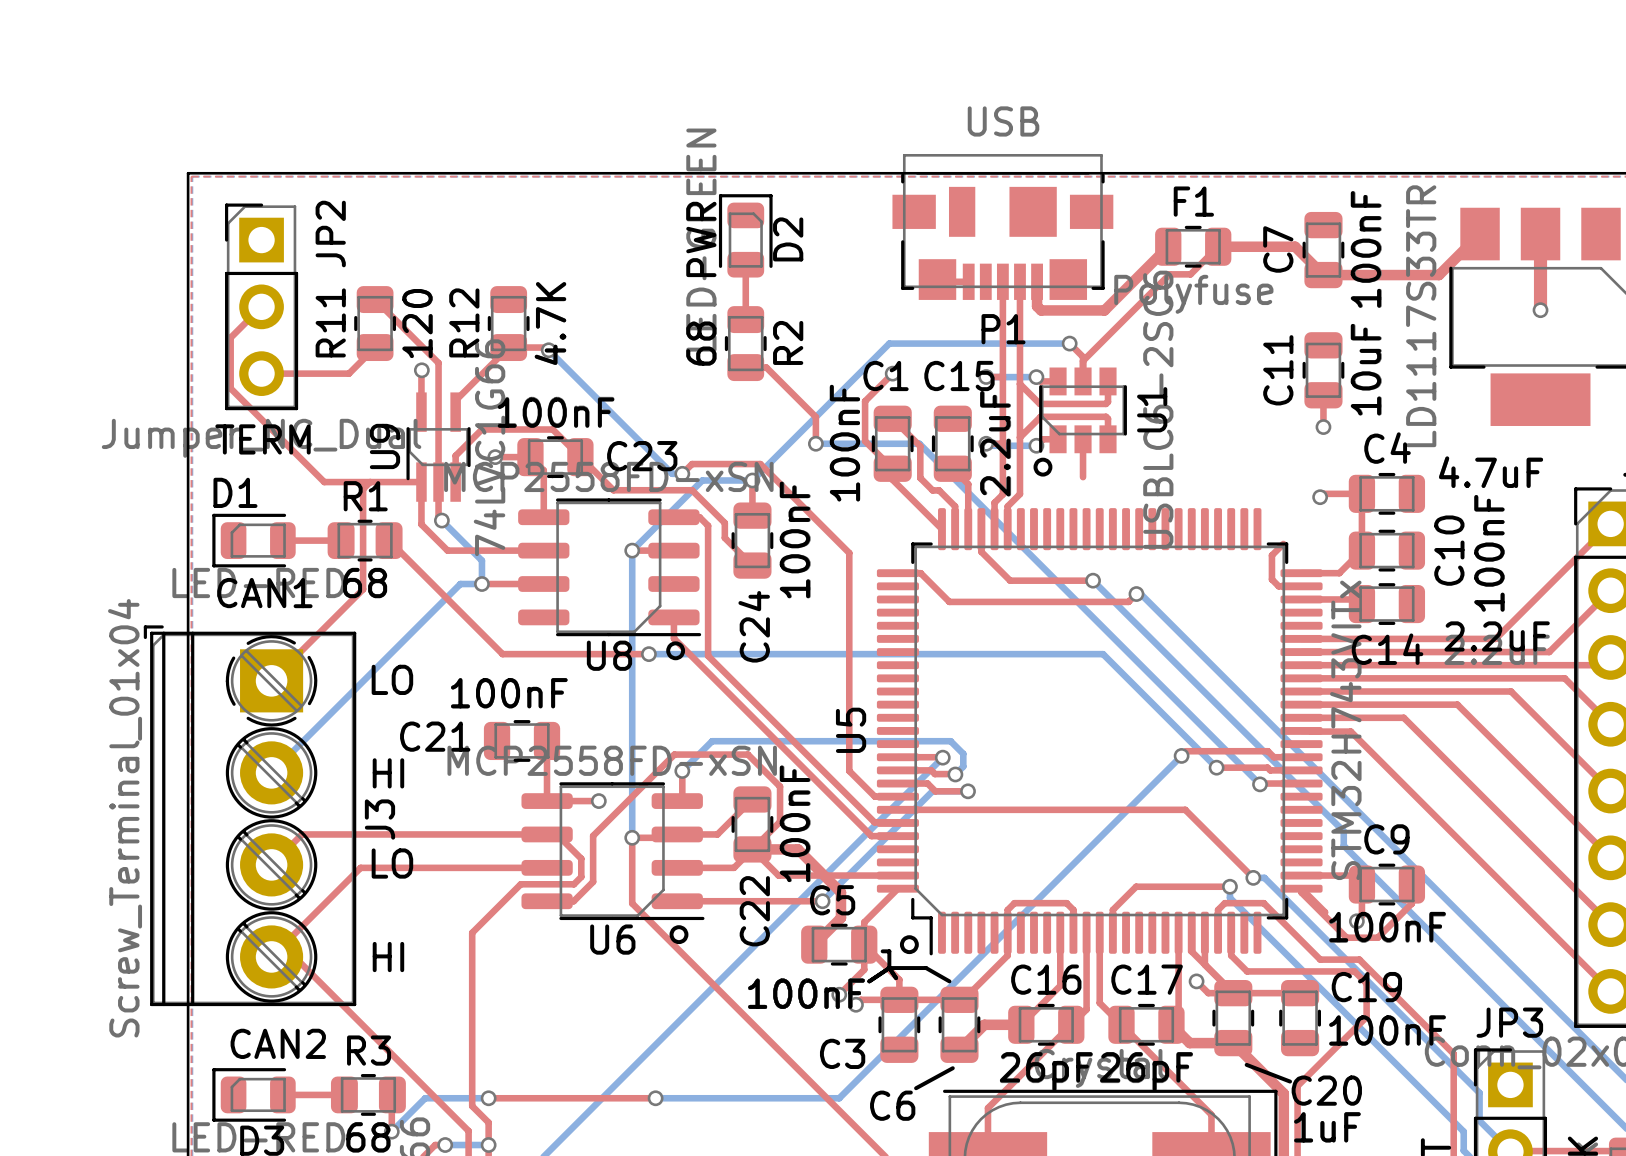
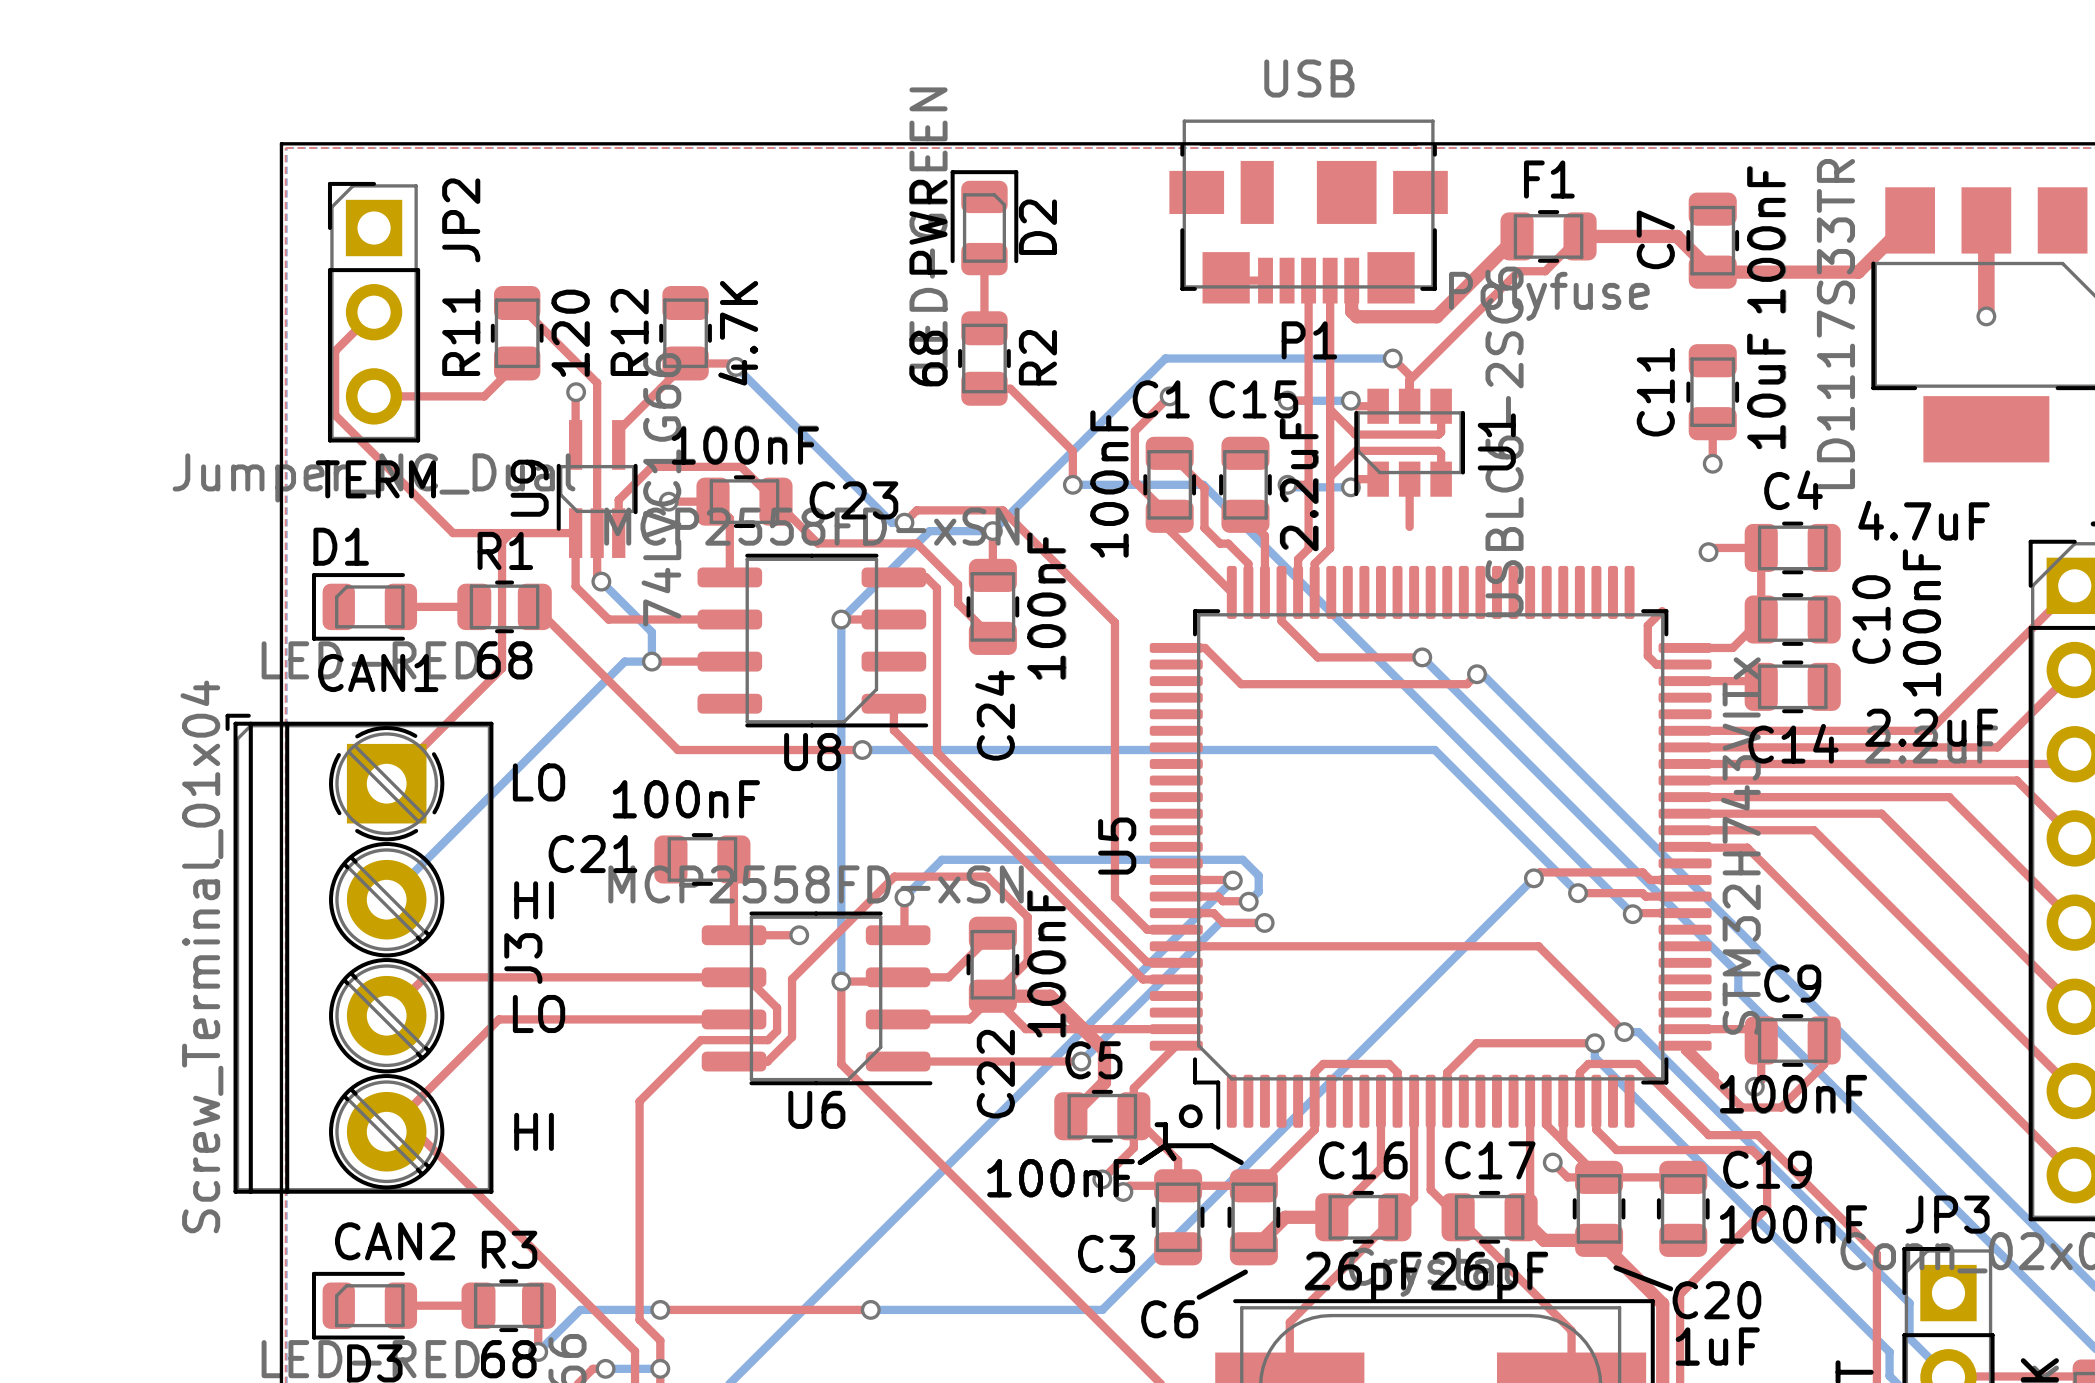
drawing: [1033, 457, 1053, 477] -> none
drawing: [666, 641, 686, 661] -> none
drawing: [669, 925, 689, 945] -> none

